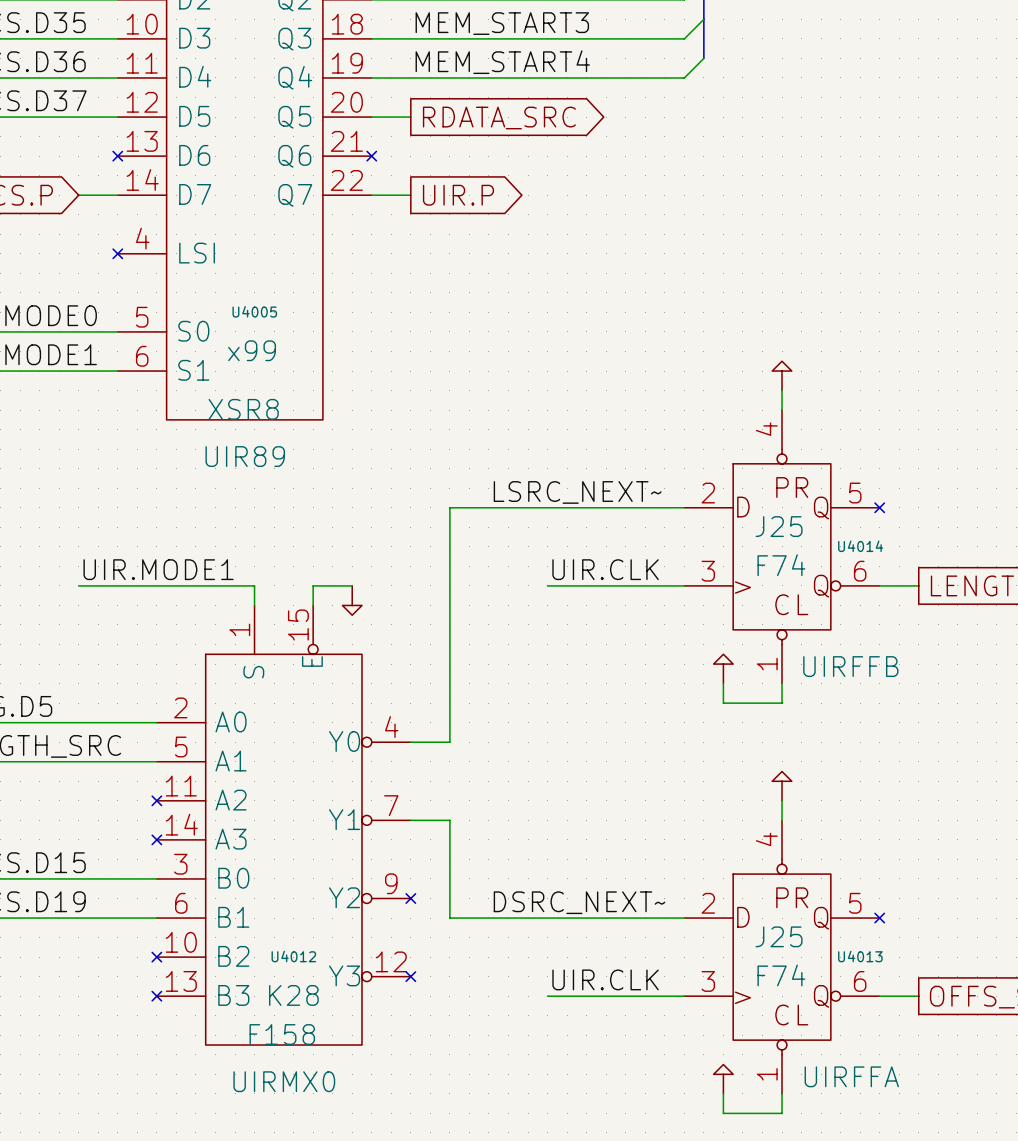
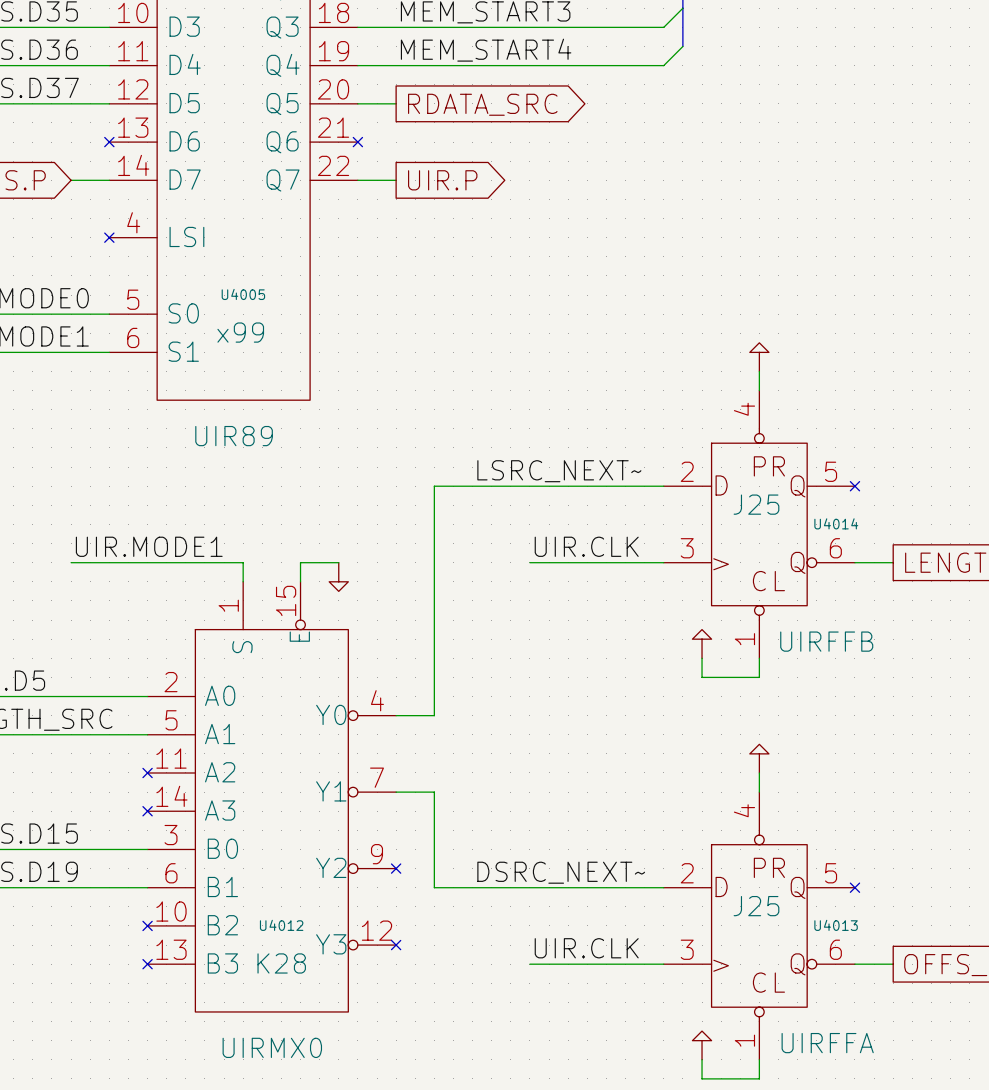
U4005 value: XSR8 (243, 409) -> none
U4014 value: F74 (781, 565) -> none
U4013 value: F74 (781, 975) -> none
U4012 value: F158 (282, 1034) -> none

